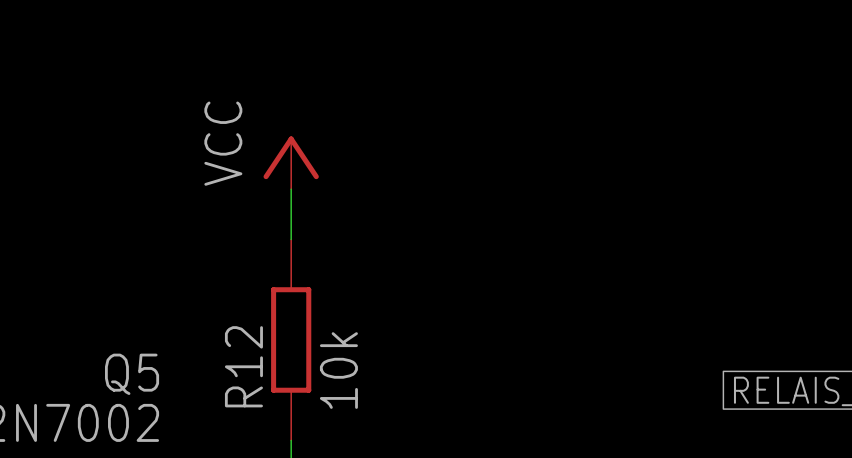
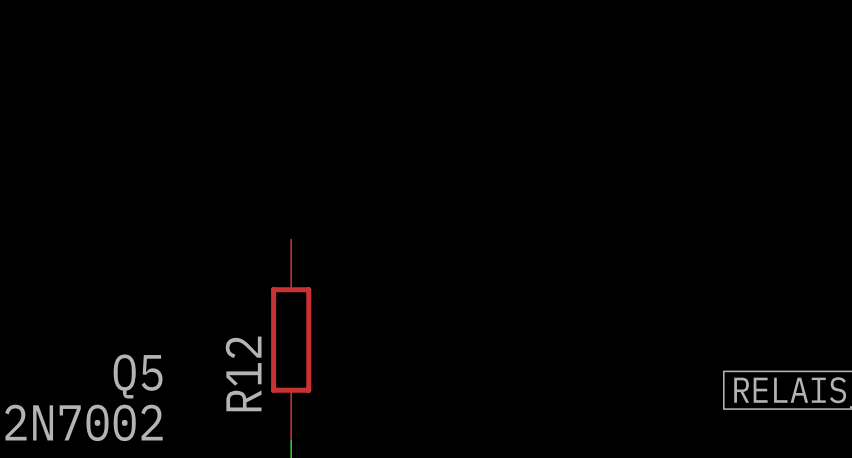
power symbol: VCC (291, 162) -> none
wire: (291, 189) (291, 239) -> none
R12 value: 10k (338, 370) -> none

